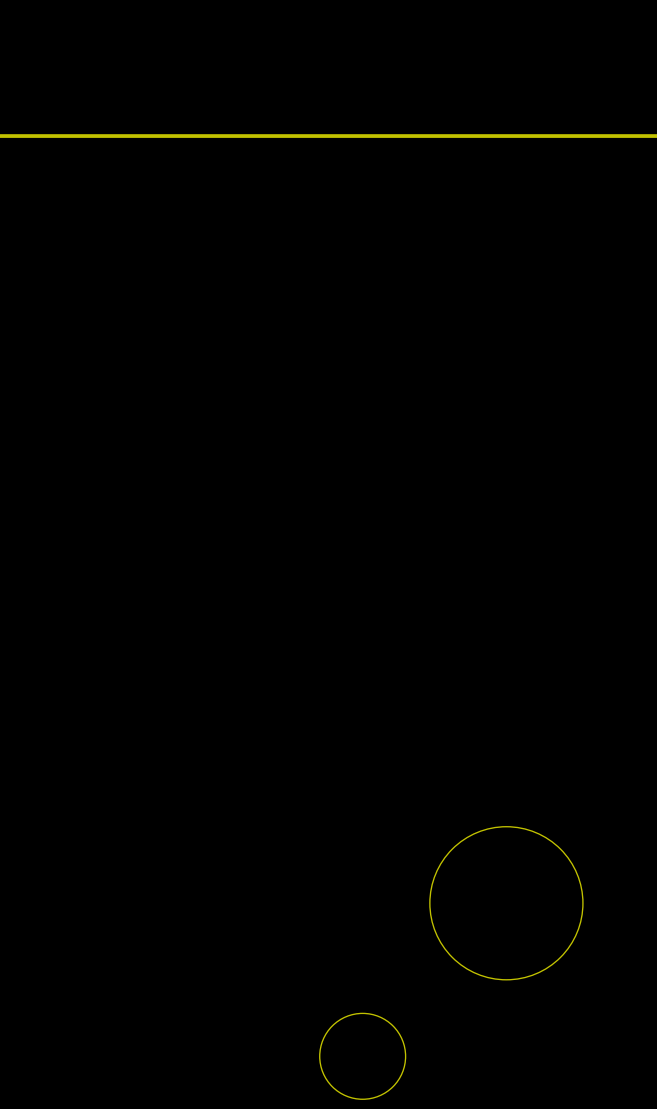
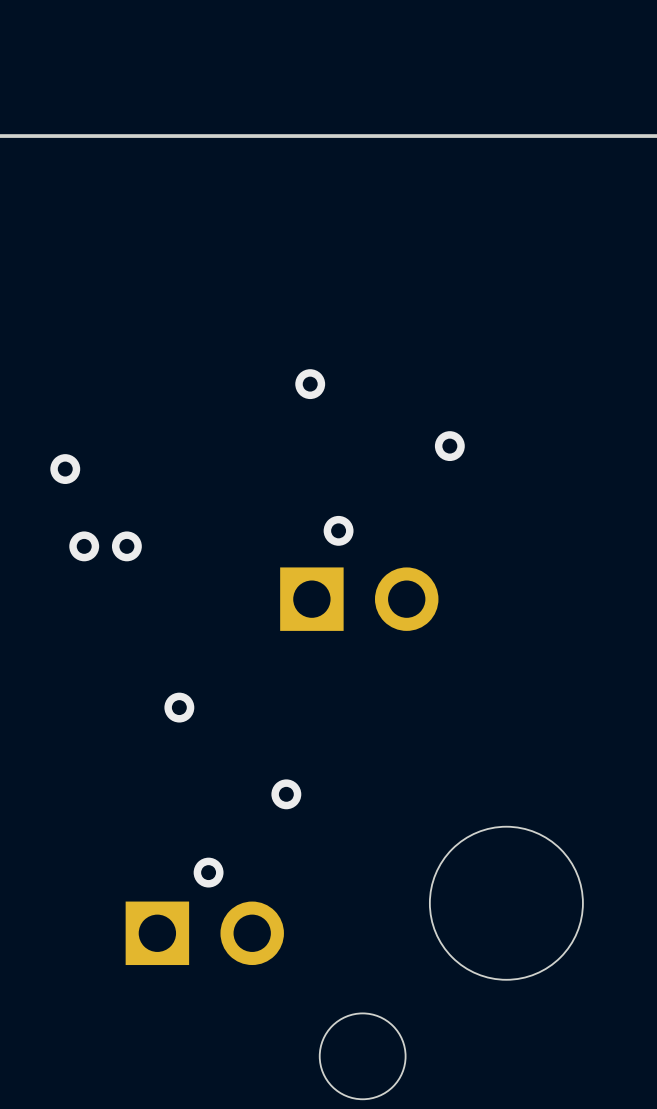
via: none -> (310, 384)
via: none -> (449, 446)
via: none -> (65, 469)
via: none -> (338, 530)
via: none -> (84, 546)
via: none -> (126, 546)
part: none -> (359, 599)
via: none -> (179, 707)
via: none -> (286, 794)
via: none -> (208, 872)
part: none -> (204, 933)

